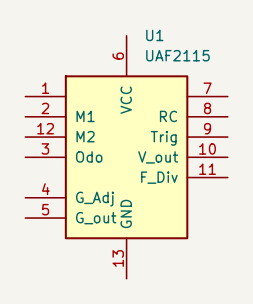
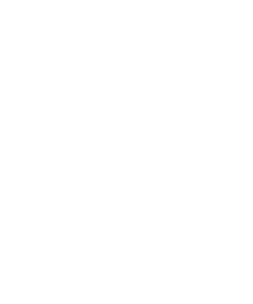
U1: UAF2115 (126, 157) -> none

